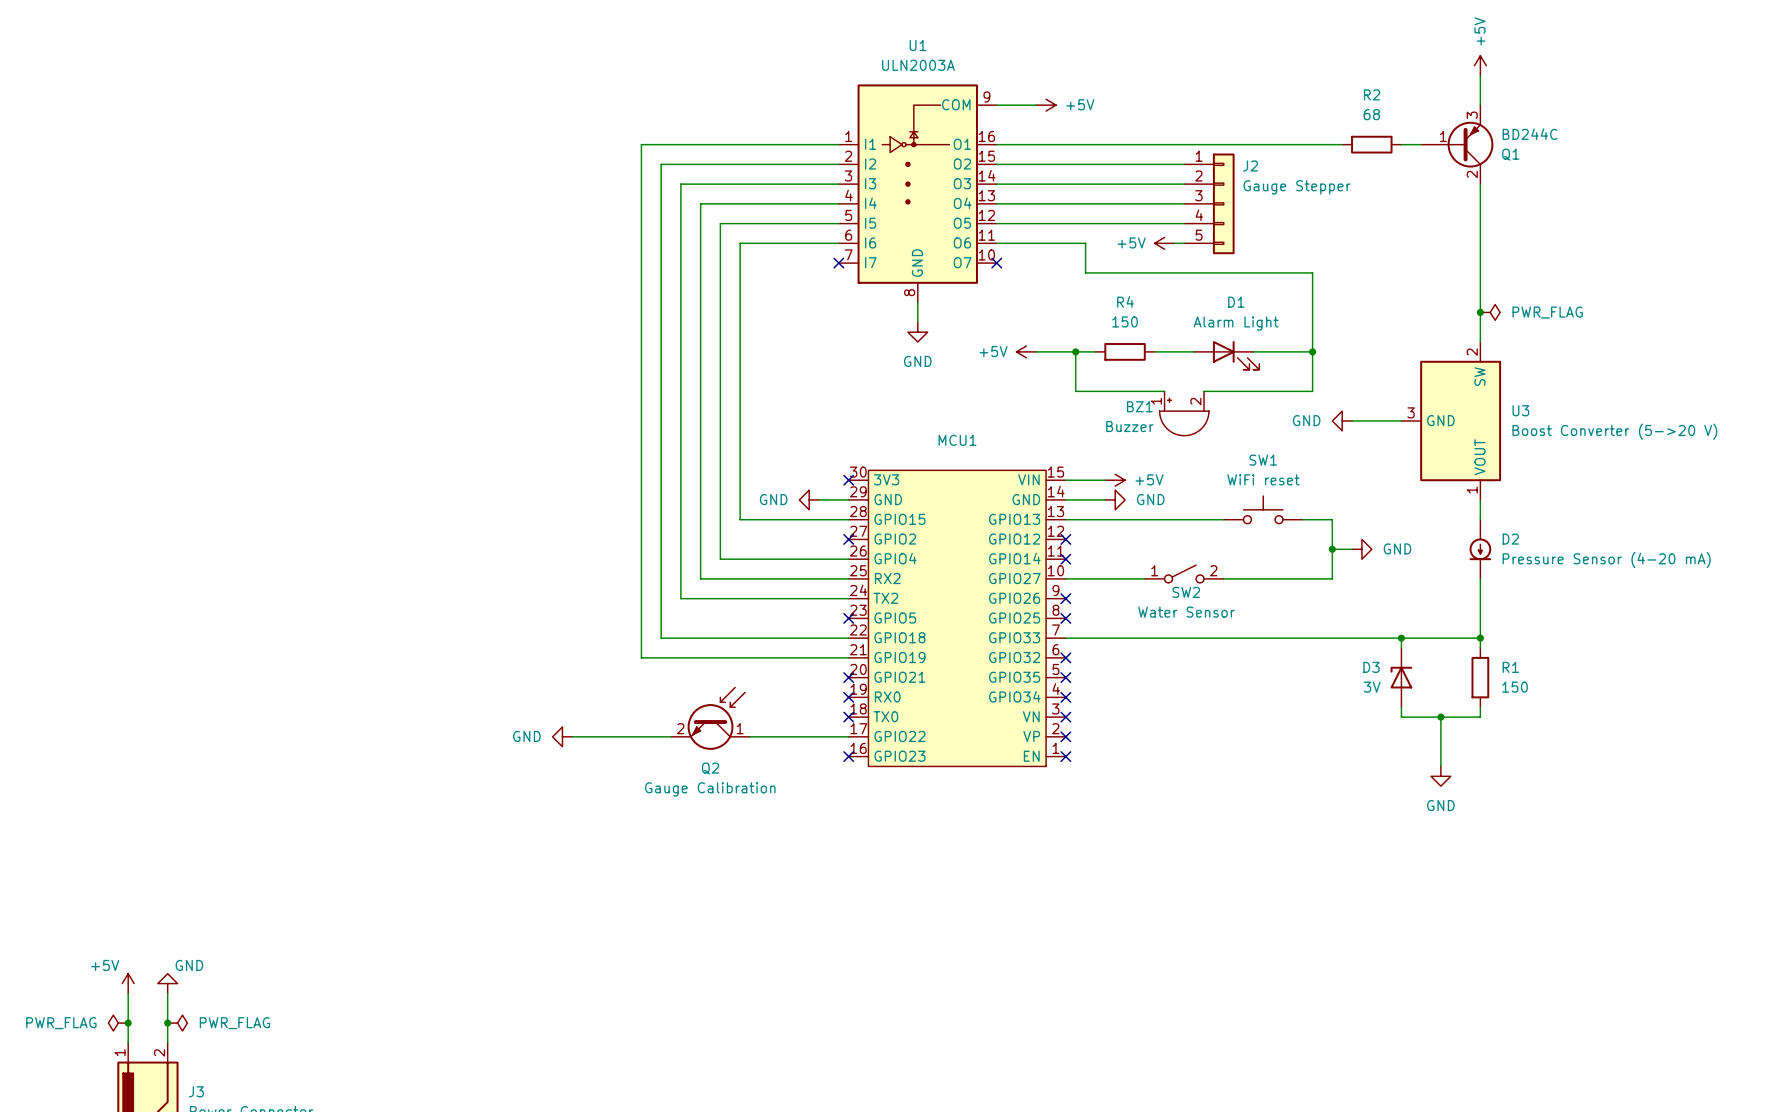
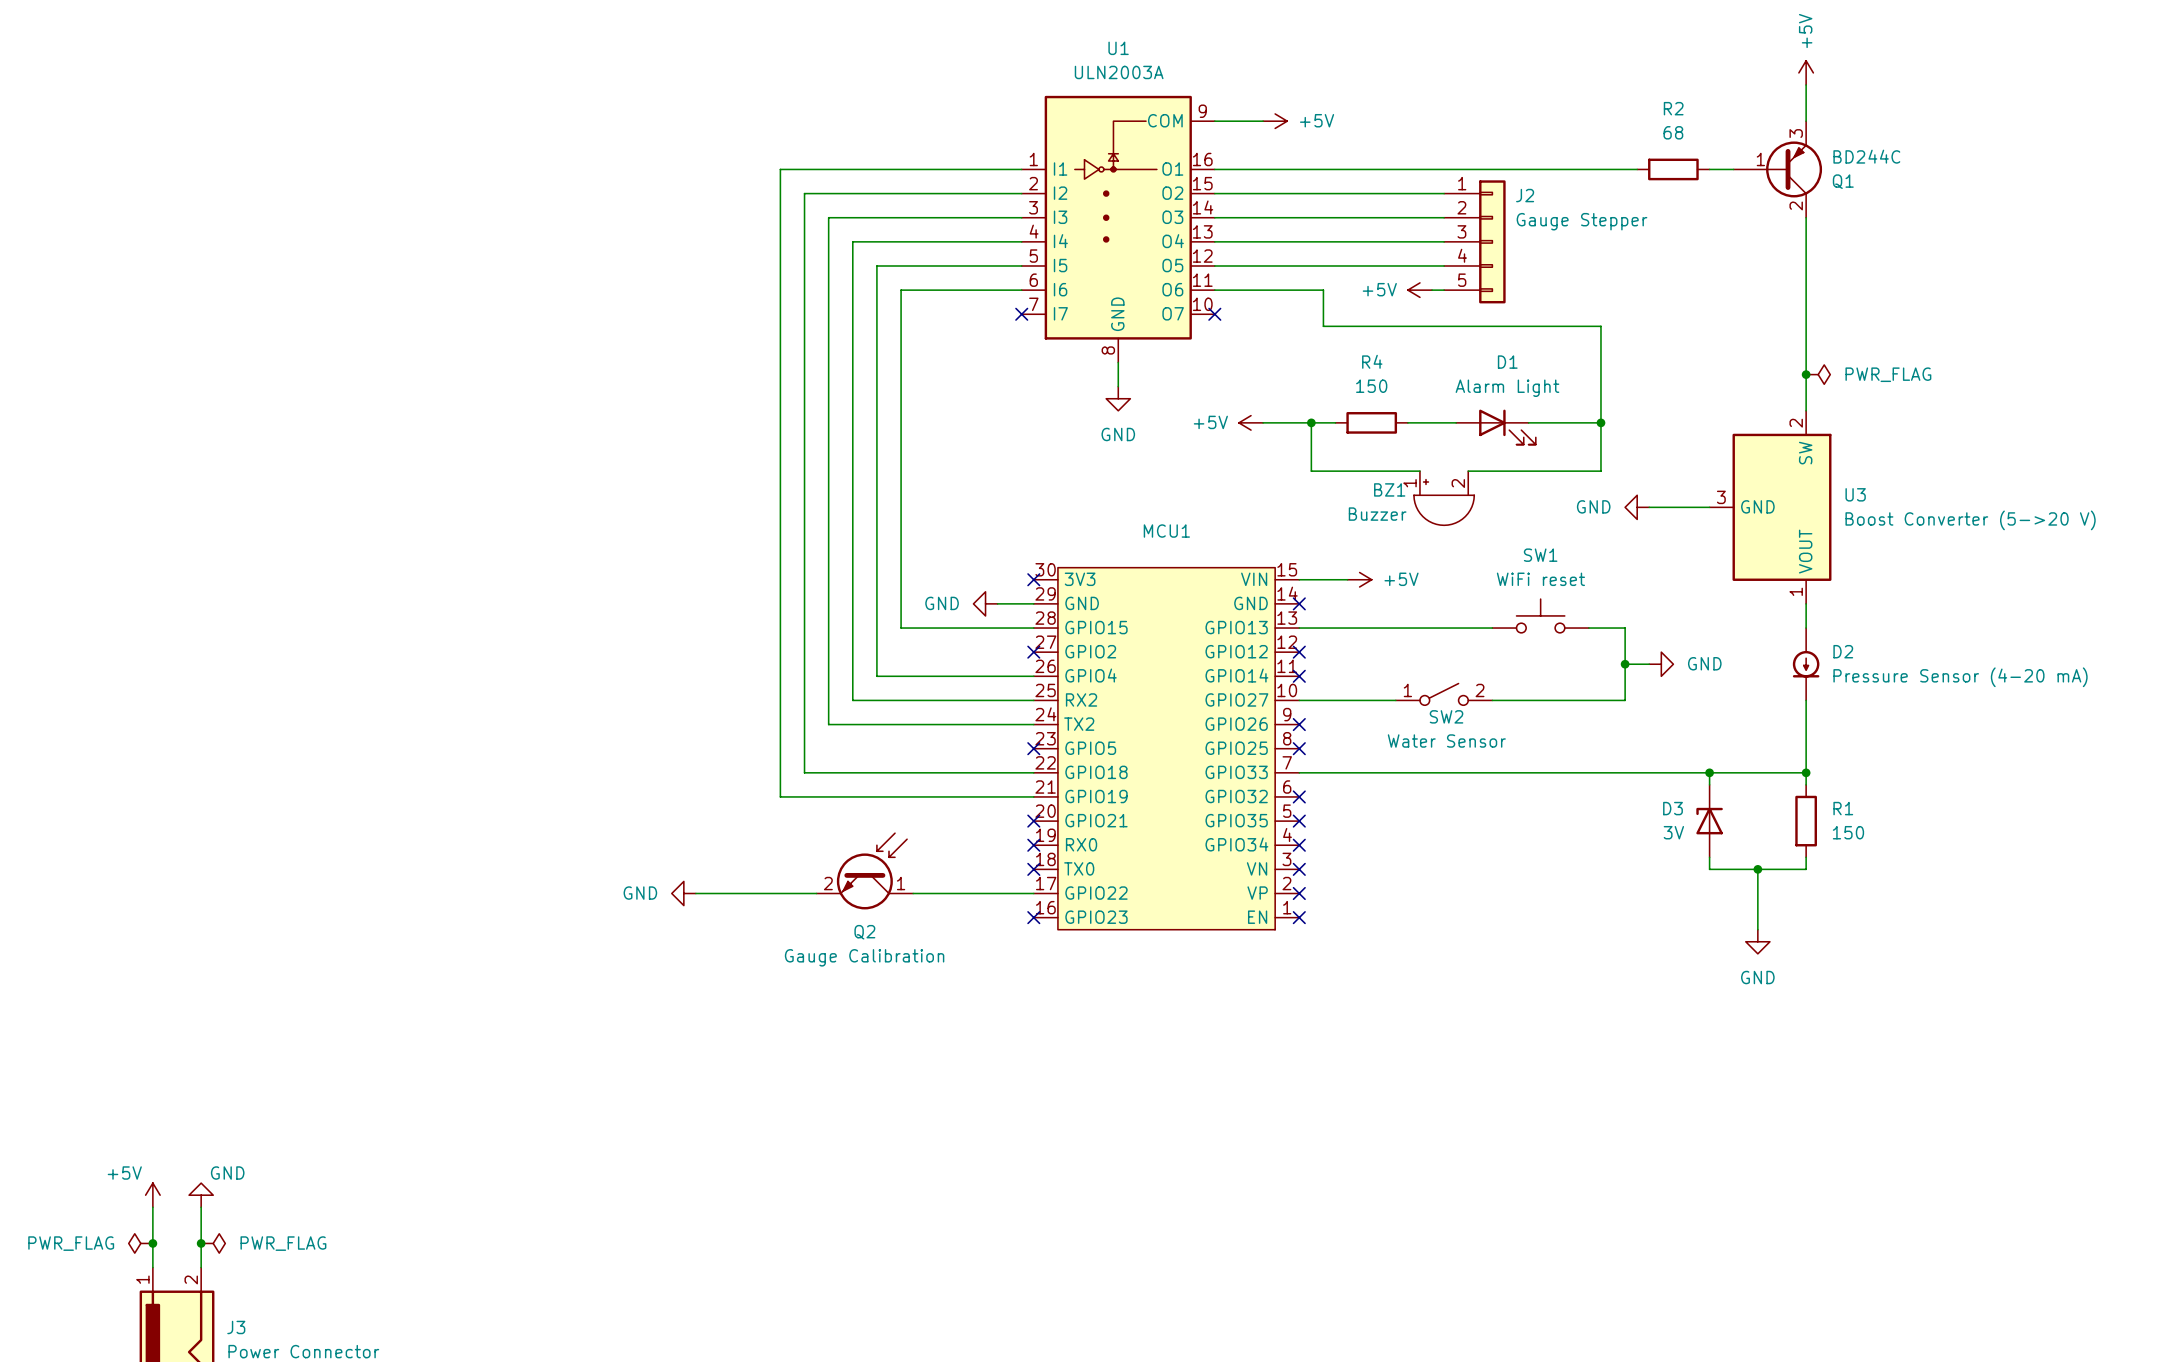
wire: (1065, 499) (1105, 499) -> none
no-connect mark: none -> (1299, 603)
power symbol: GND (1115, 499) -> none

